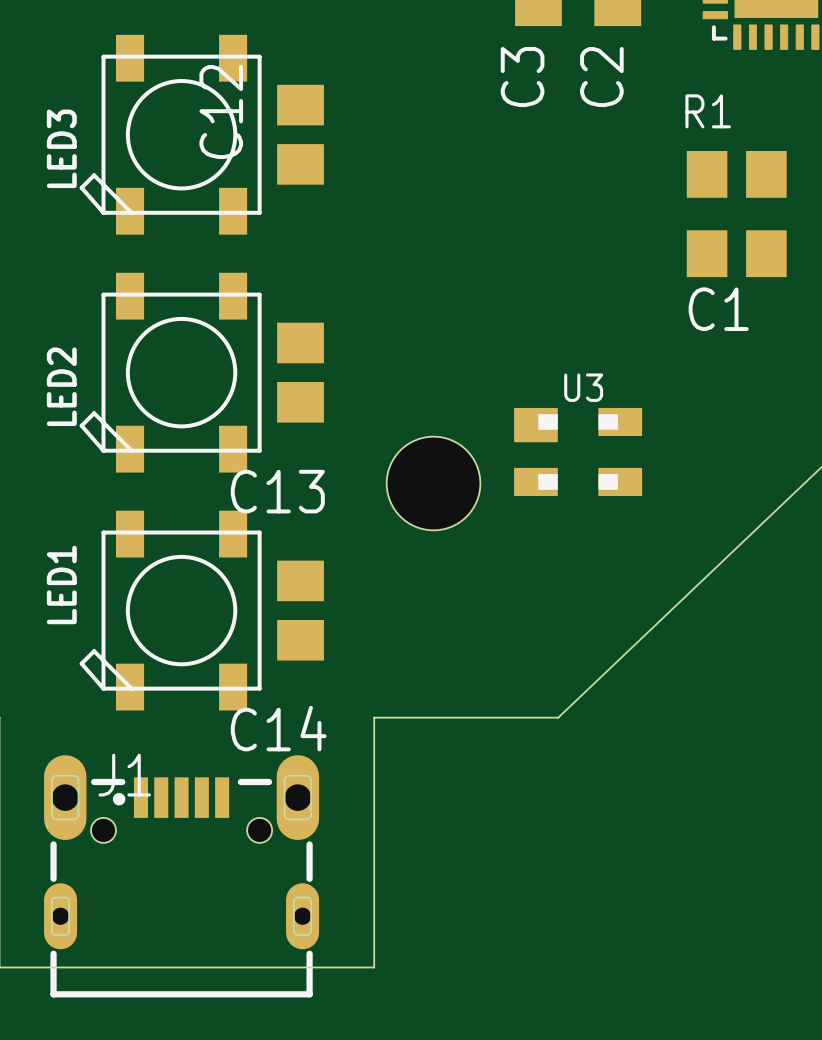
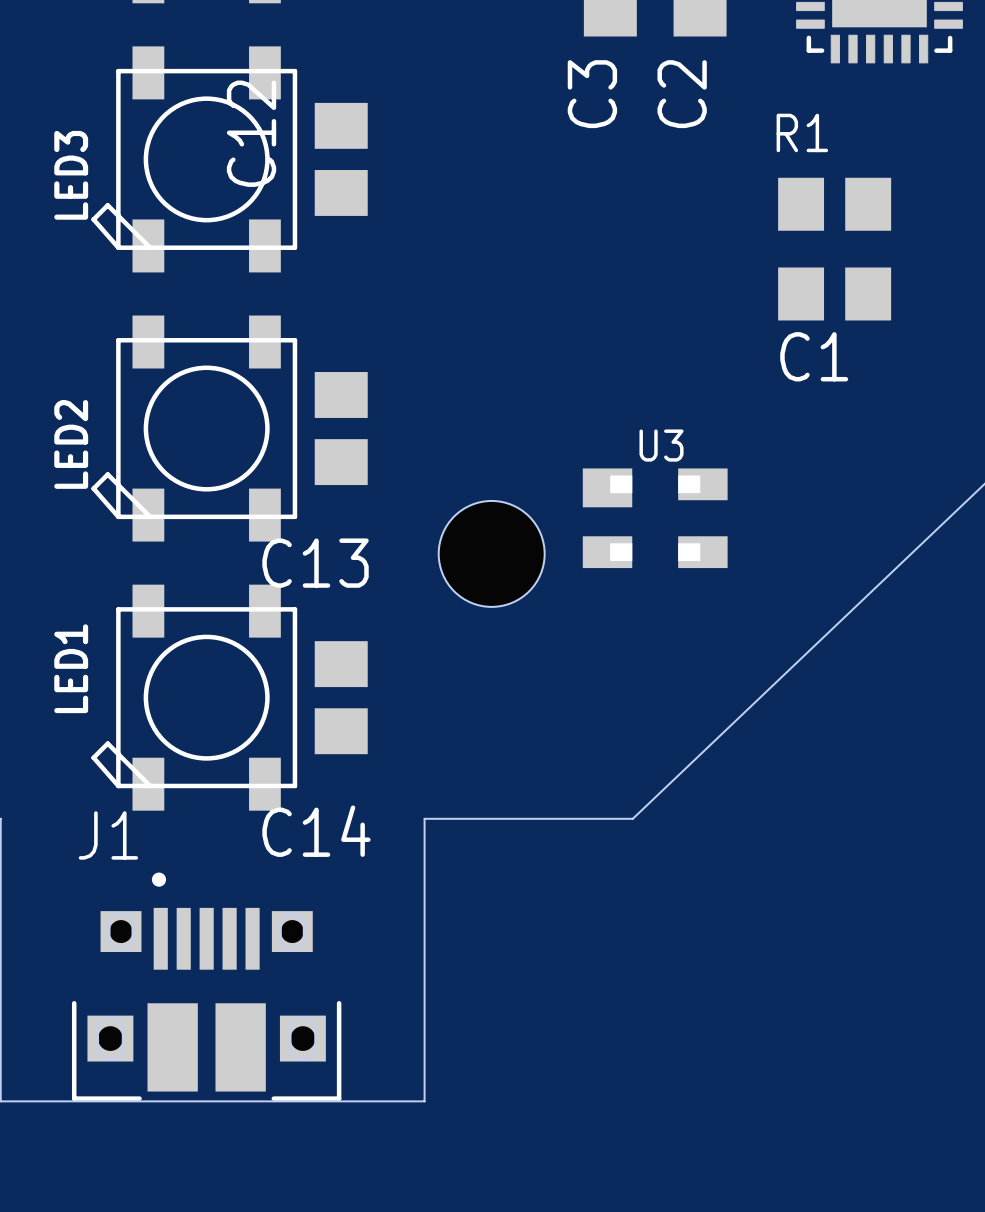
J1 footprint: [44, 755, 320, 998] -> [71, 872, 342, 1101]

